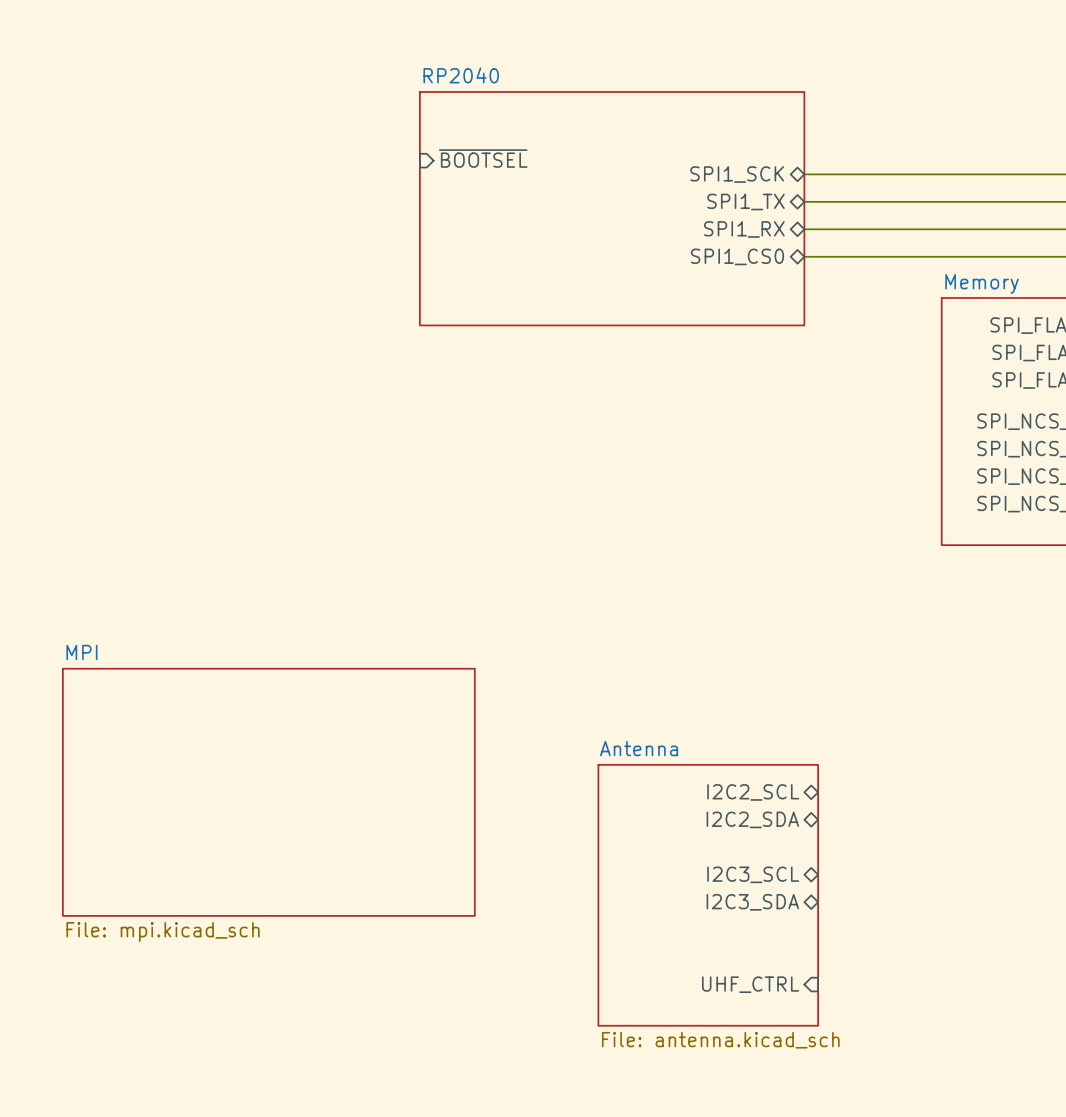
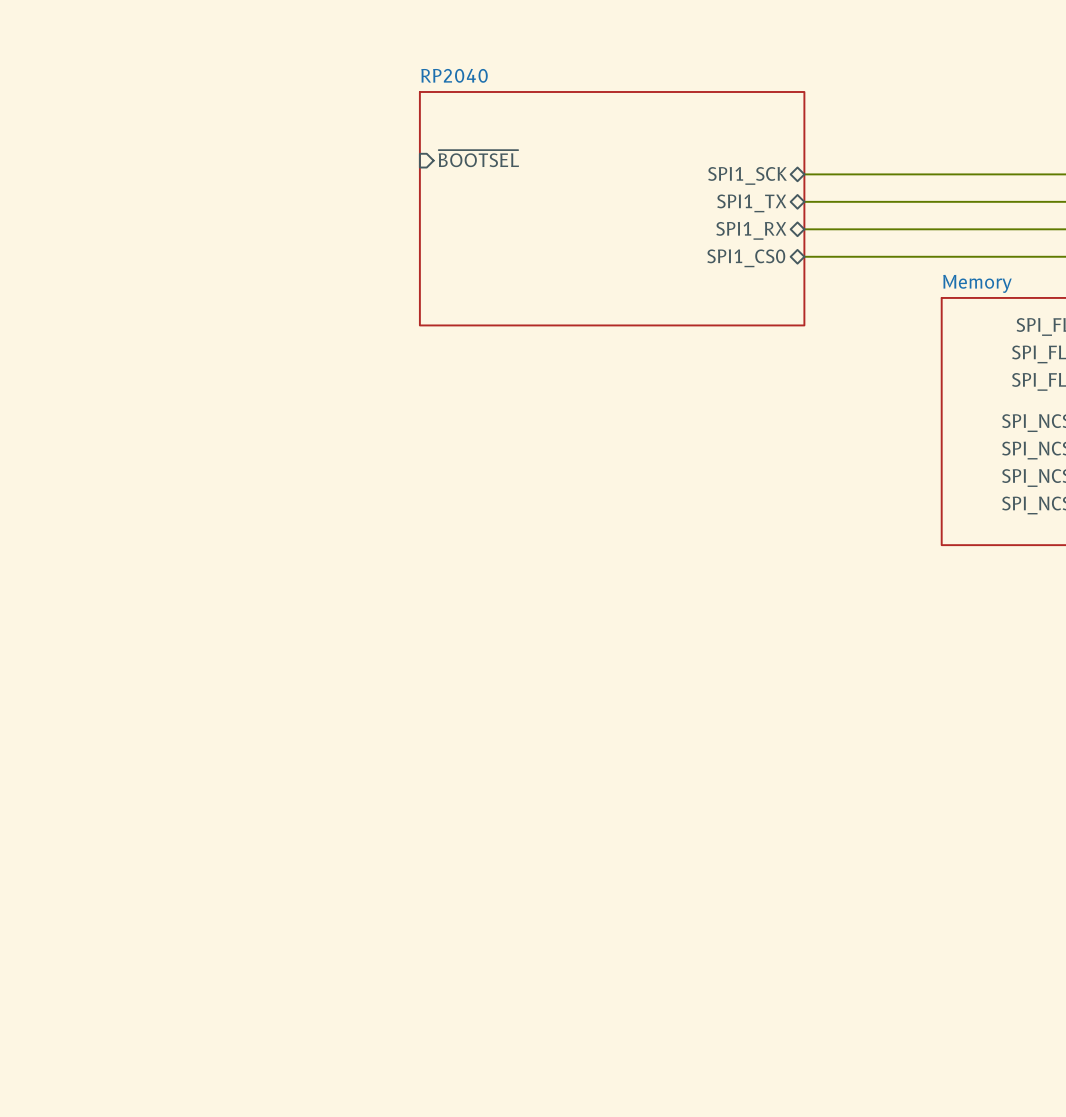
sheet MPI: File: mpi.kicad_sch (268, 792) -> none
sheet pin: I2C2_SCL (753, 792) -> none
sheet pin: I2C2_SDA (752, 819) -> none
sheet pin: I2C3_SCL (753, 874) -> none
sheet Antenna: File: antenna.kicad_sch (708, 895) -> none
sheet pin: I2C3_SDA (752, 902) -> none
sheet pin: UHF_CTRL (750, 984) -> none

